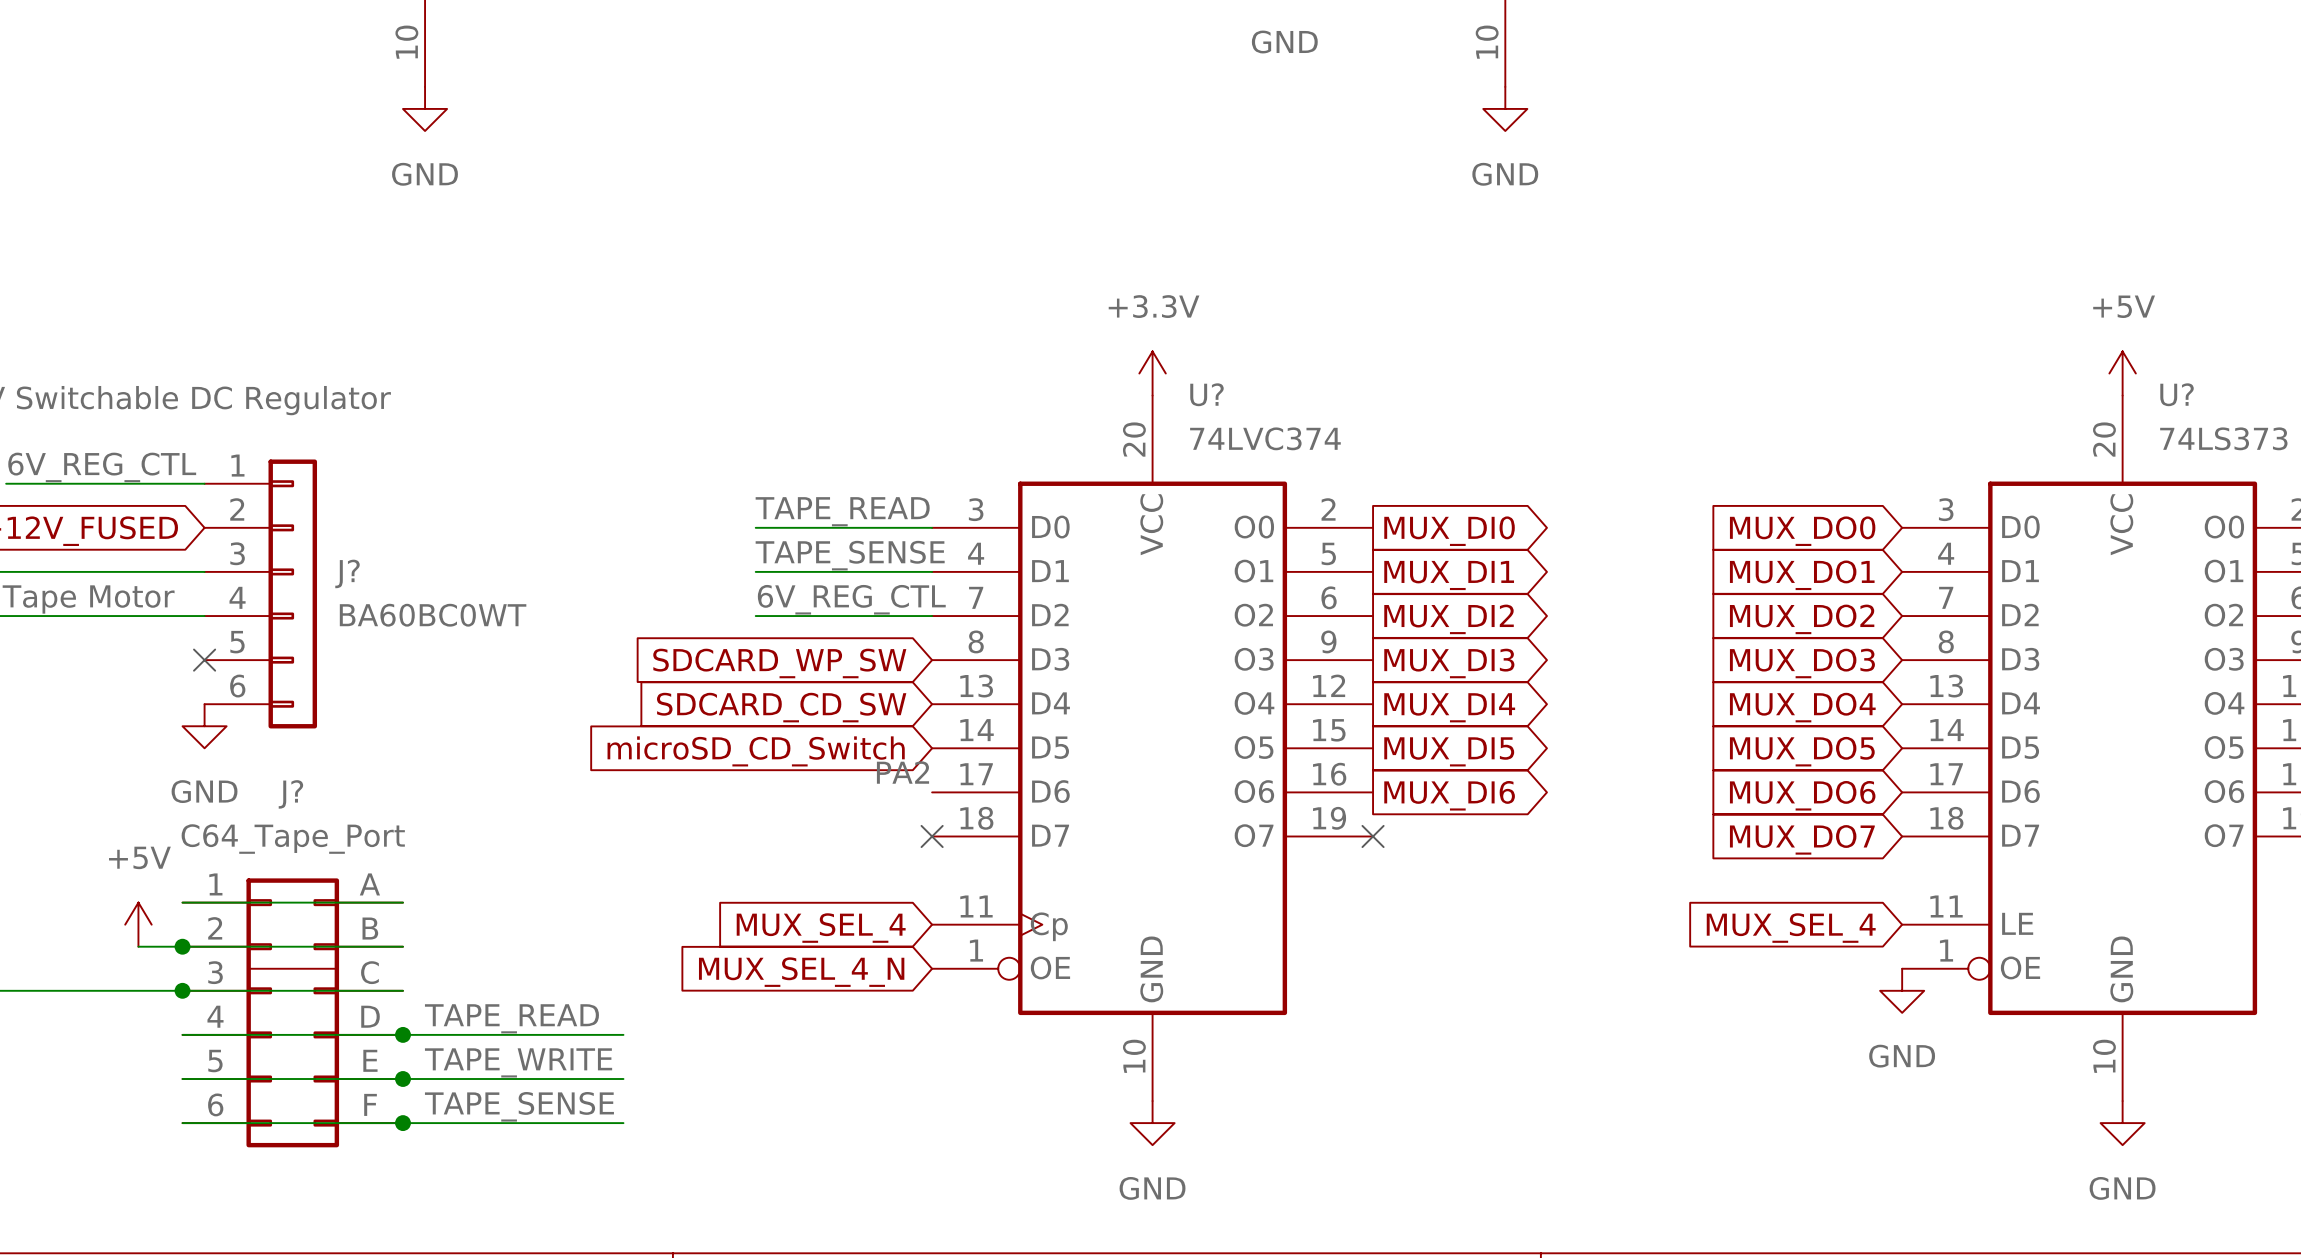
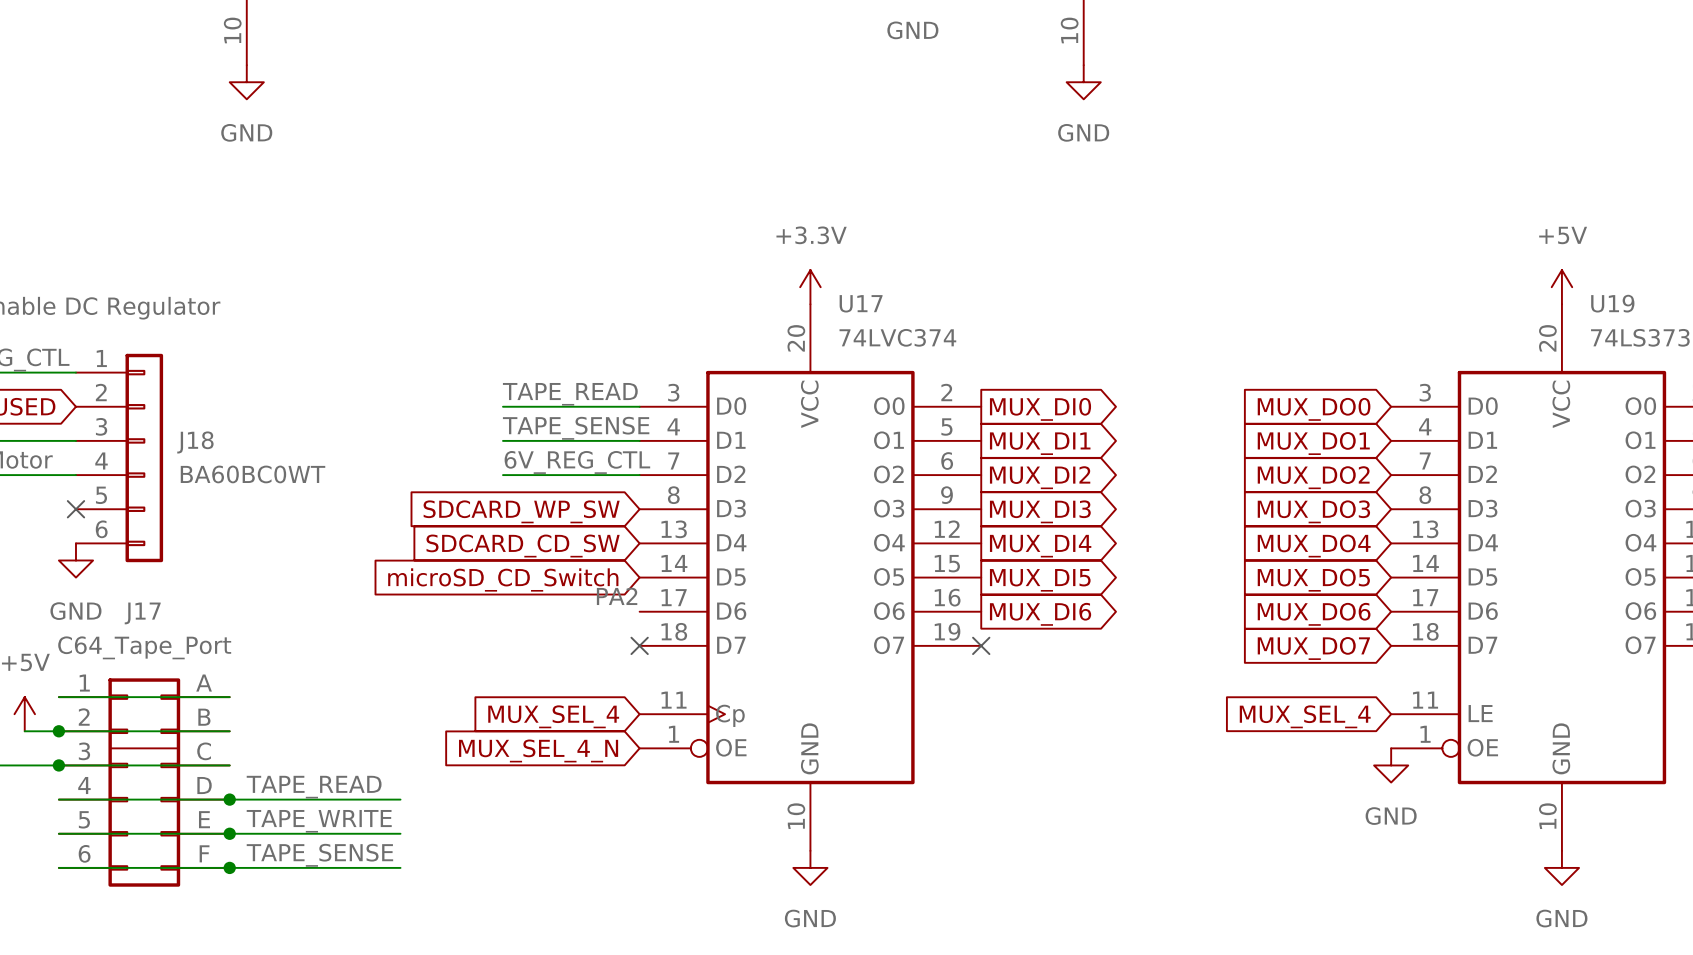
U? name: U? (1206, 394) -> U17 (861, 303)
U? name: U? (2177, 394) -> U19 (1612, 303)
J? name: J? (347, 573) -> J18 (195, 442)
J? name: J? (290, 794) -> J17 (142, 613)

